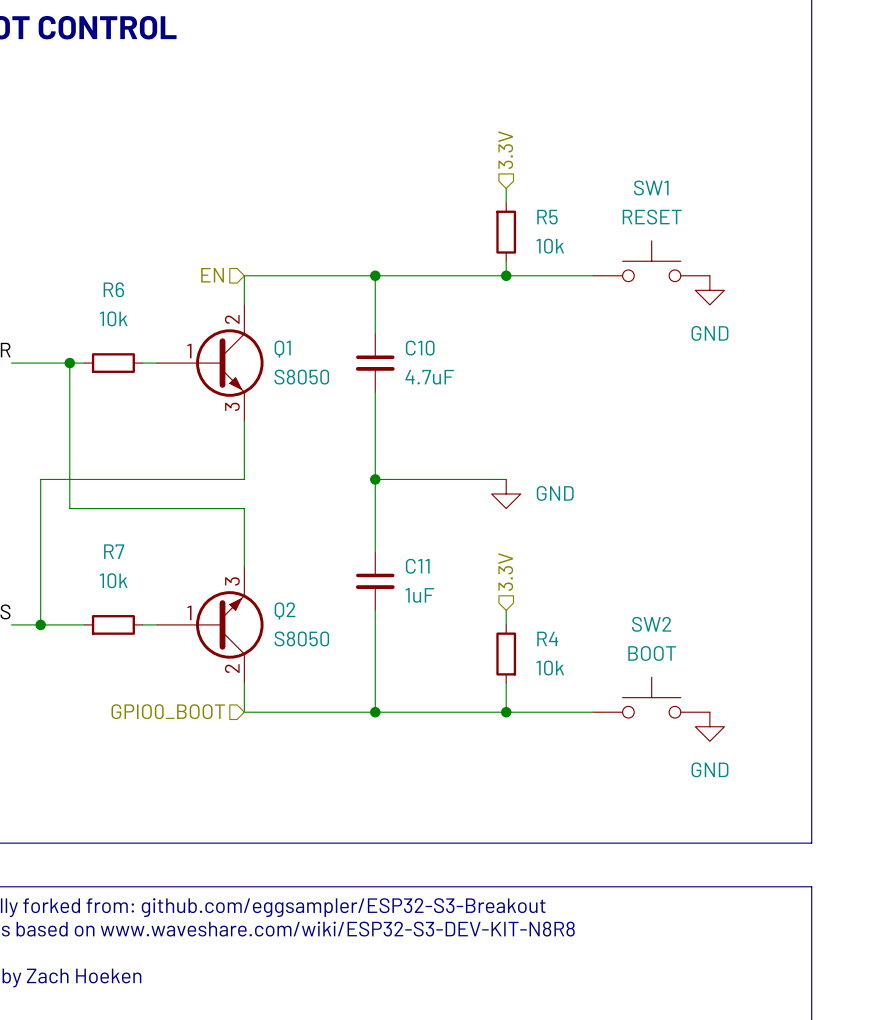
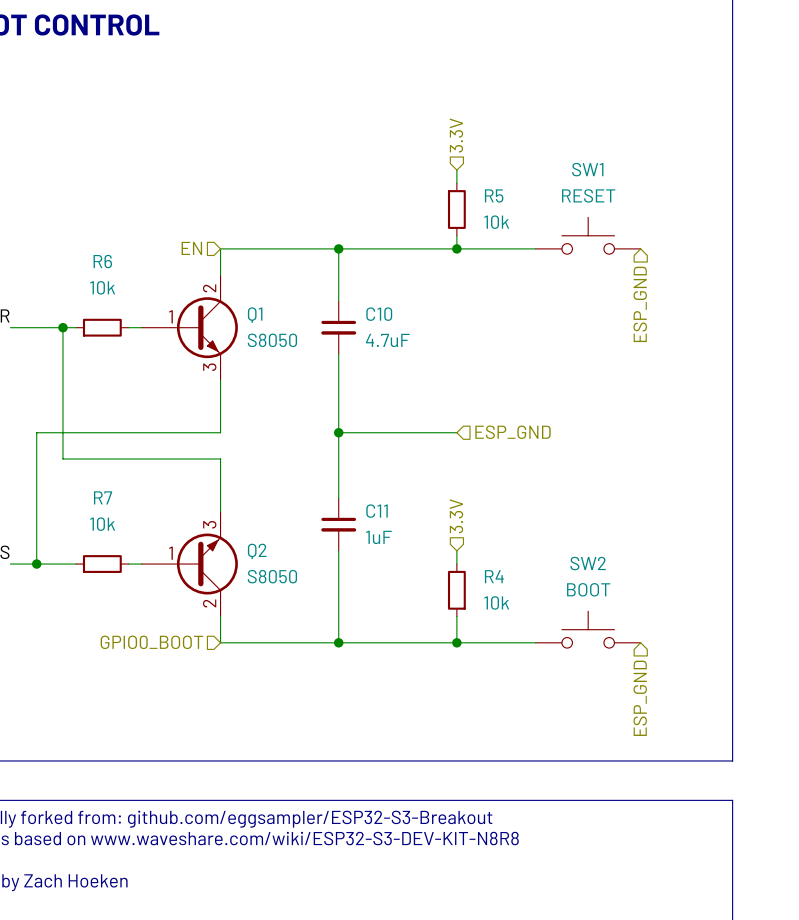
power symbol: GND (709, 290) -> none
hierarchical label: none -> ESP_GND (640, 304)
hierarchical label: none -> ESP_GND (512, 432)
power symbol: GND (506, 493) -> none
power symbol: GND (709, 726) -> none
hierarchical label: none -> ESP_GND (640, 698)

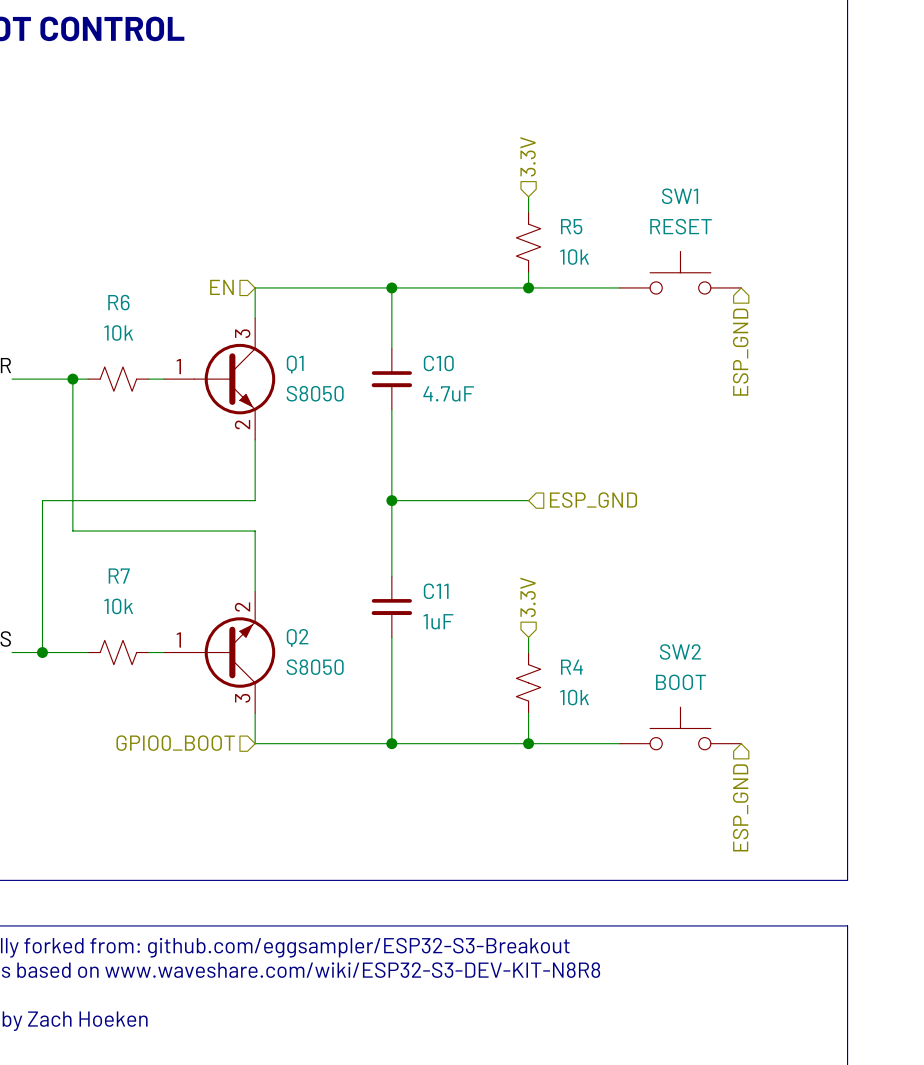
R5 symbol: [447, 183, 466, 236] -> [516, 212, 541, 273]
Q1 symbol: [141, 275, 238, 381] -> [164, 318, 276, 440]
R6 symbol: [76, 318, 129, 337] -> [88, 366, 149, 392]
Q2 symbol: [141, 511, 238, 617] -> [164, 591, 276, 714]
R7 symbol: [76, 555, 129, 573] -> [88, 640, 149, 665]
R4 symbol: [447, 564, 466, 617] -> [516, 652, 541, 714]

